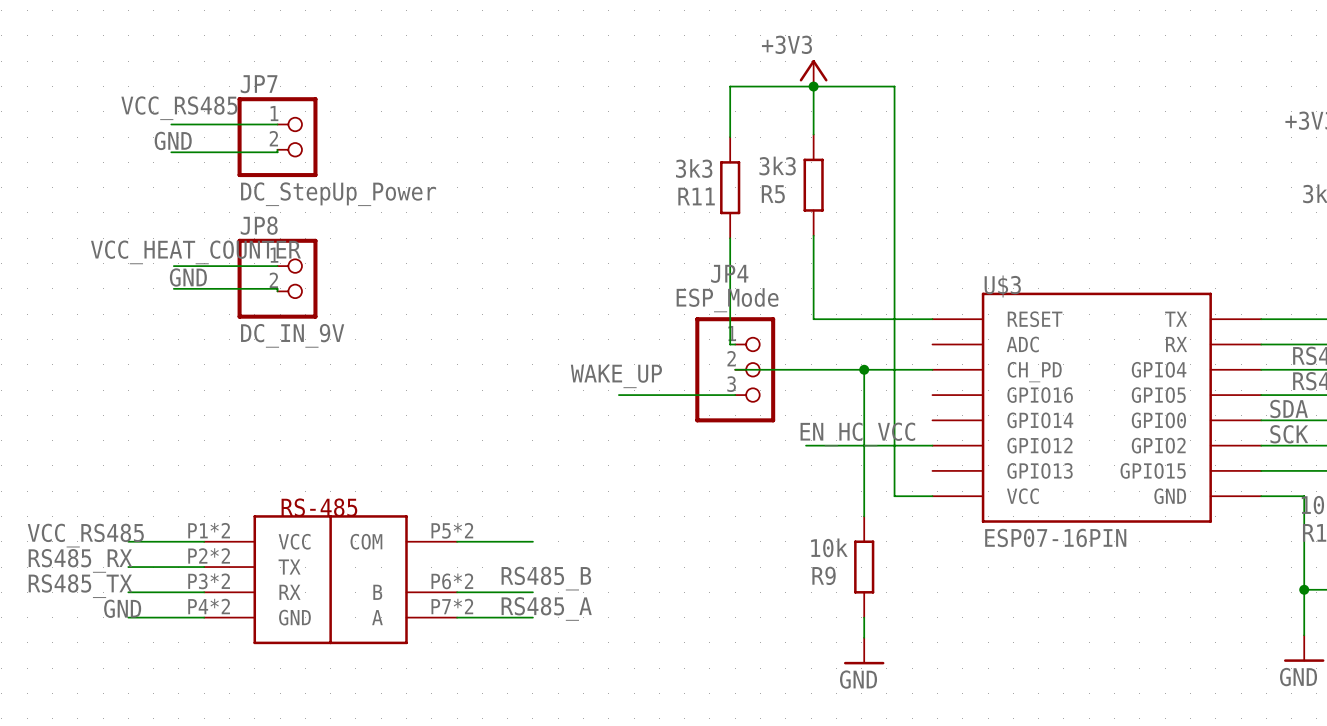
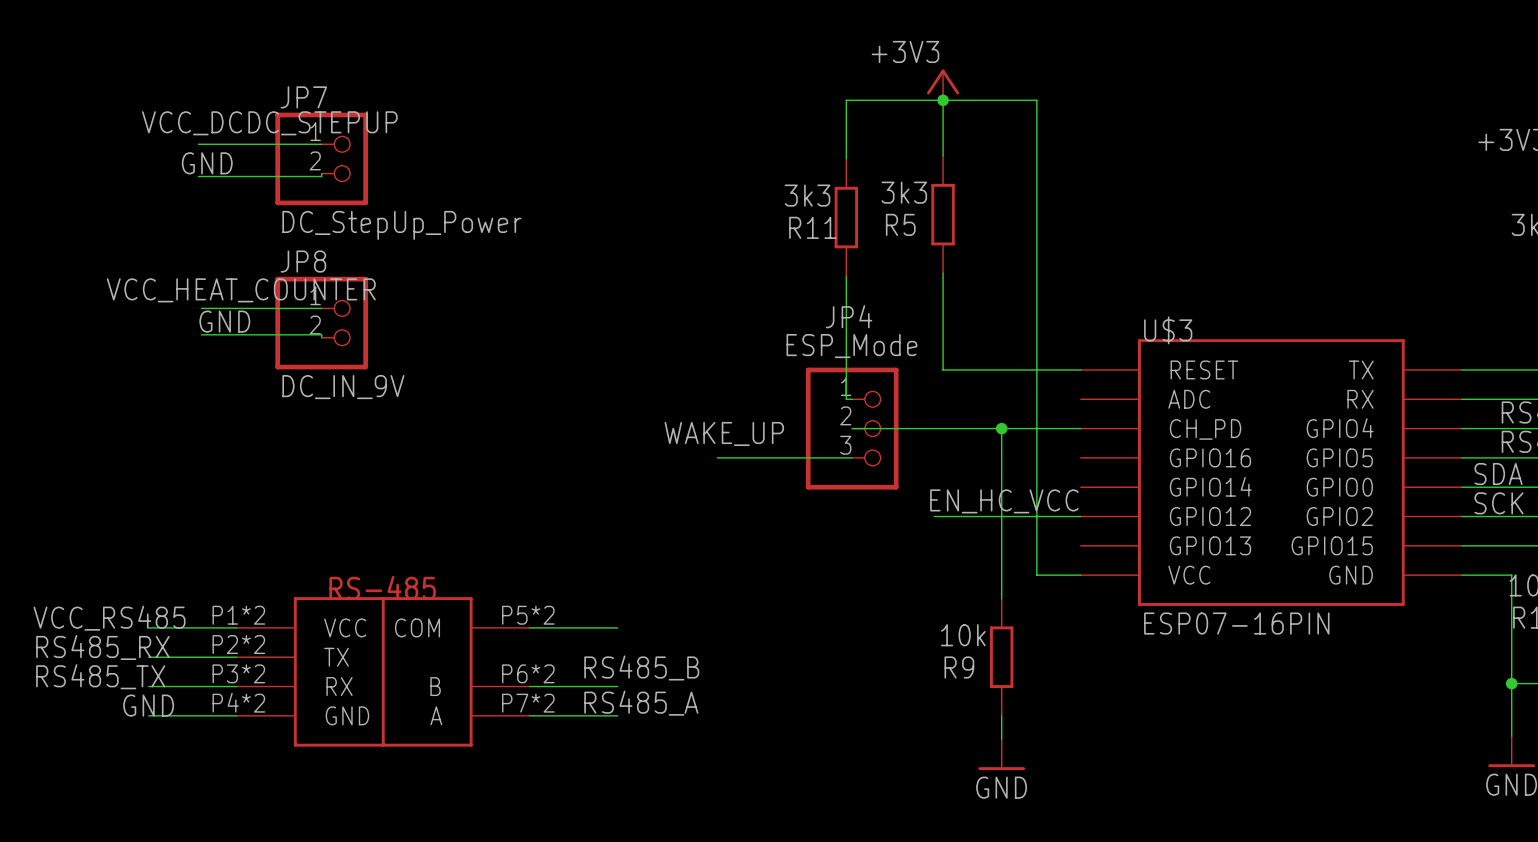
label: VCC_RS485 (179, 108) -> VCC_DCDC_STEPUP (269, 123)

